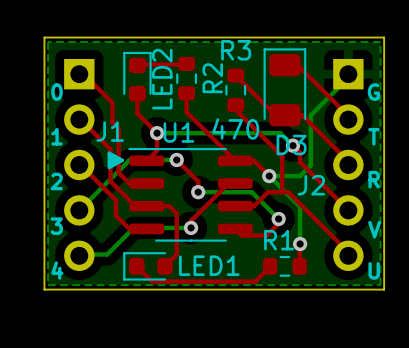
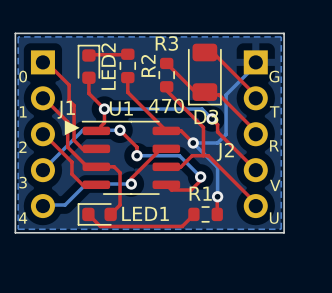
D3 rotation: 0° (284, 87) -> 180° (204, 74)

